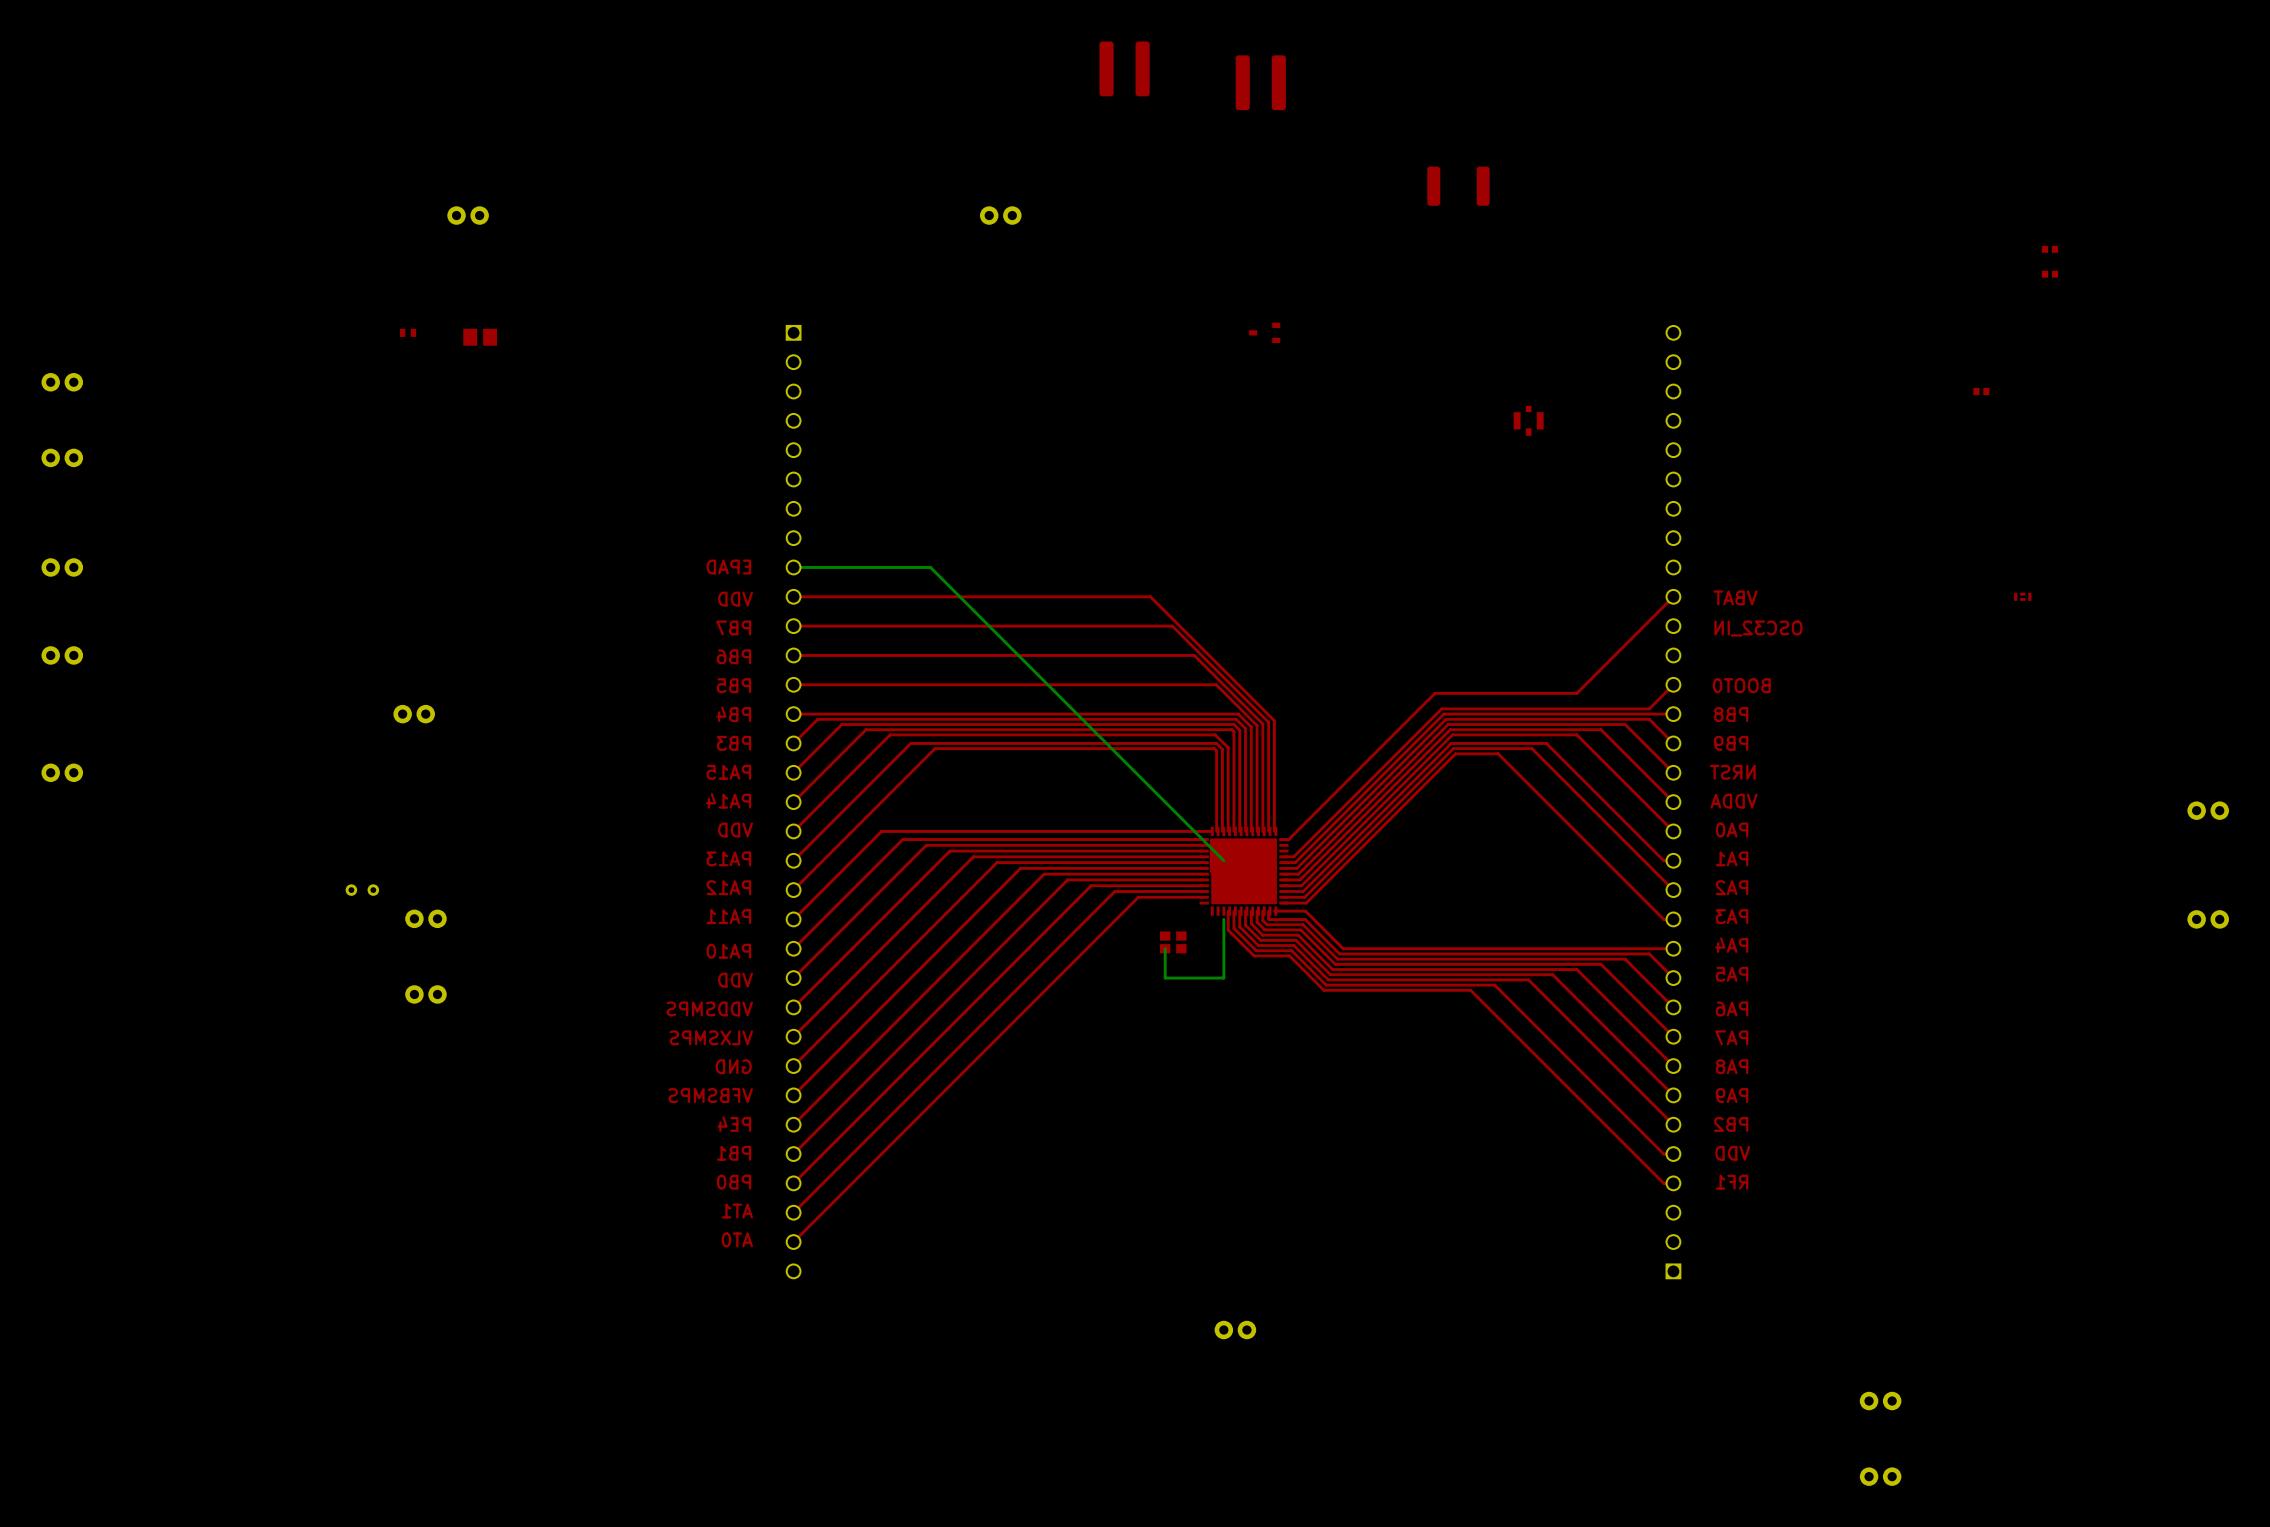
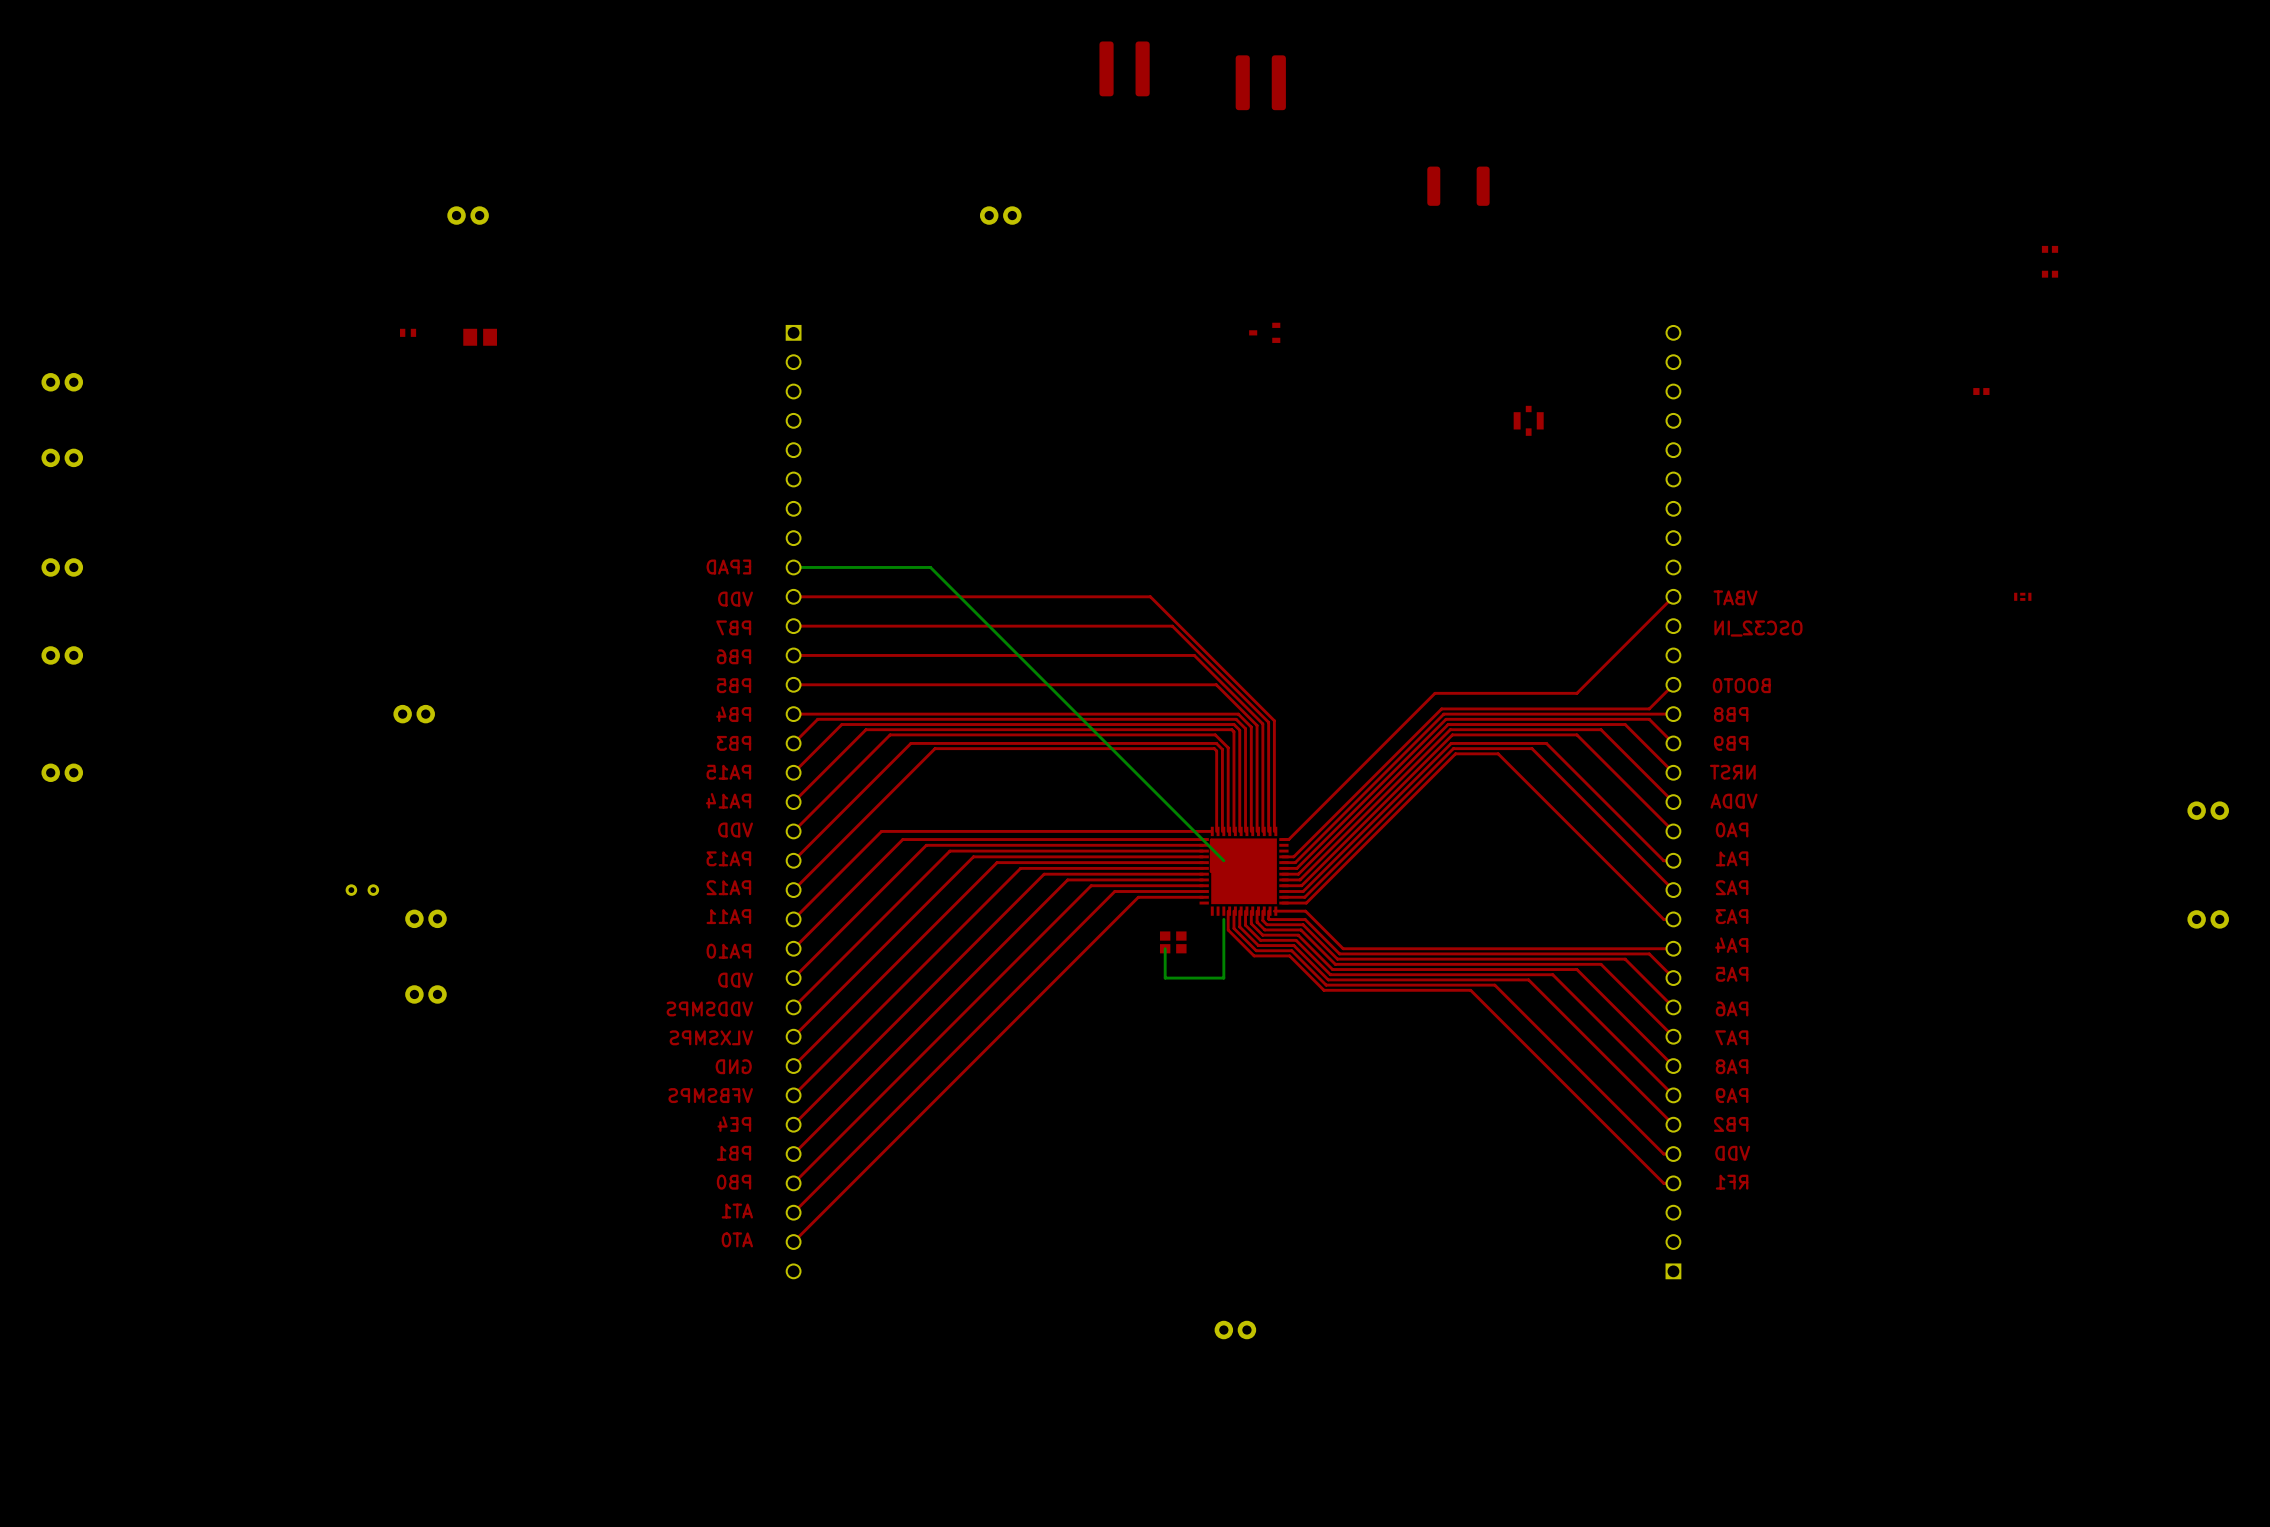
part: (1880, 1401) -> none
part: (1880, 1476) -> none

